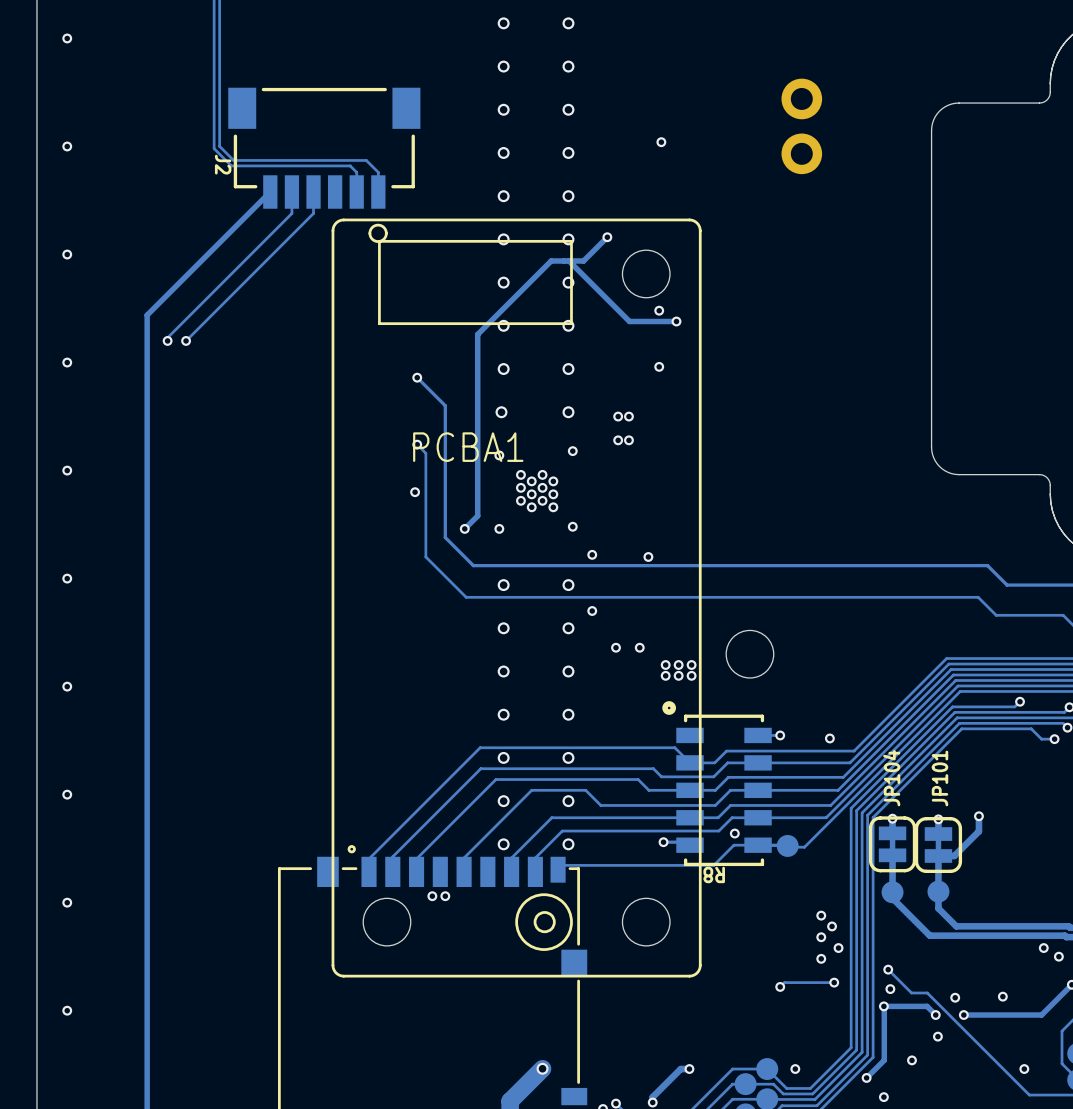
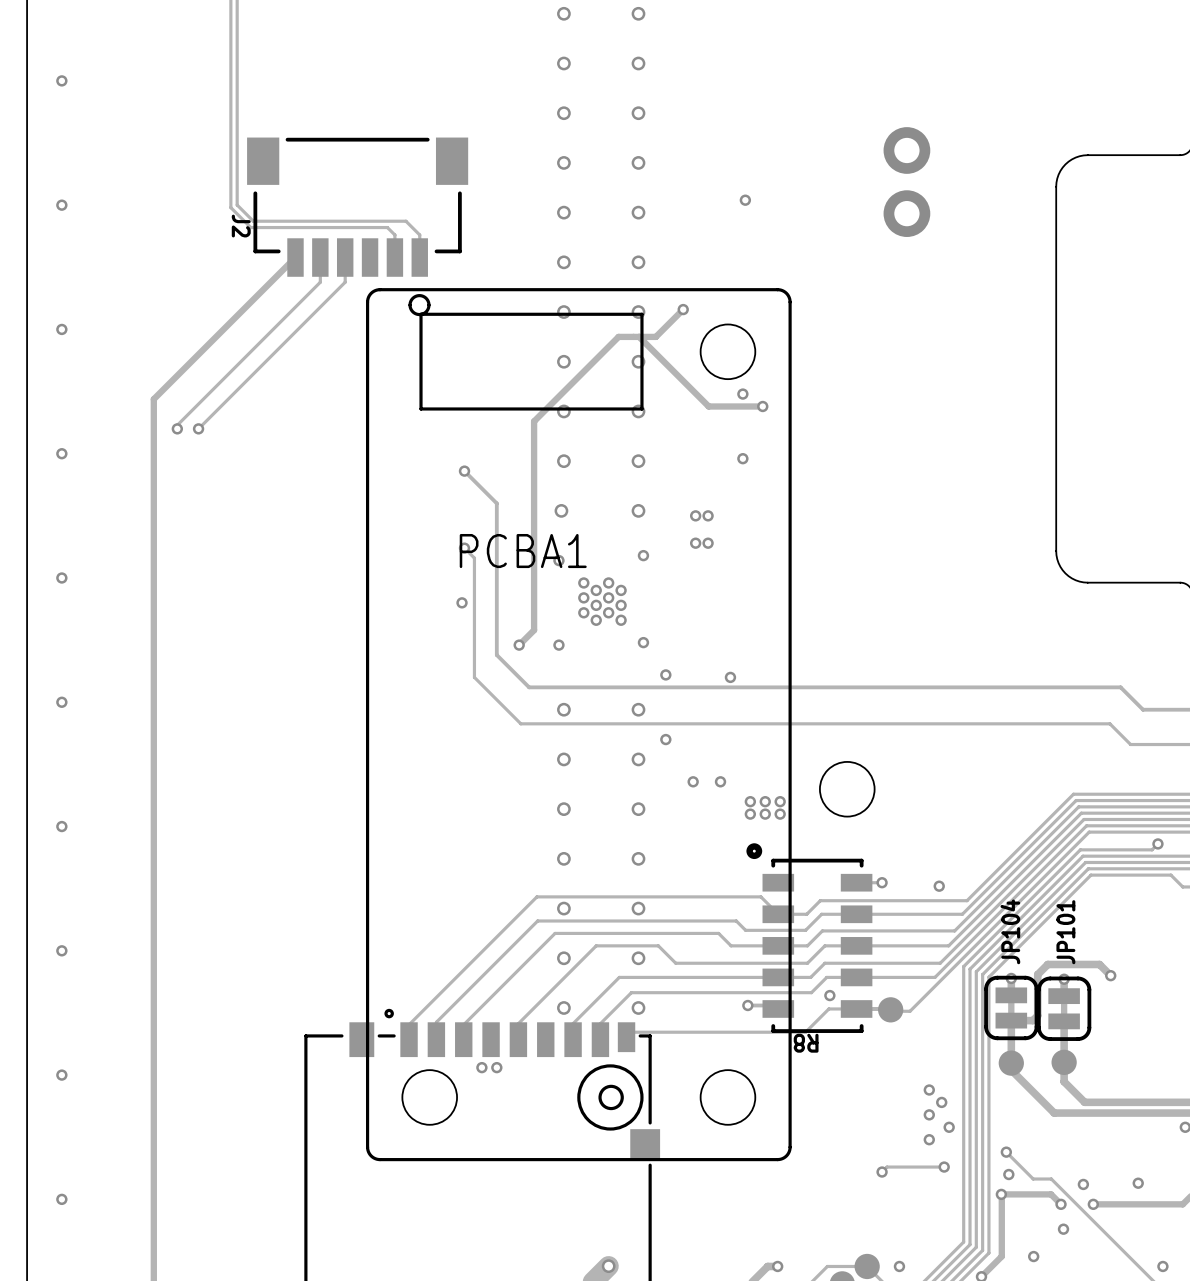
track: (978, 816) (978, 831) (954, 855) (938, 855) -> (1110, 975) (1099, 964) (1047, 964) (1037, 974) (1037, 1015) (1032, 1020) (1011, 1020)

